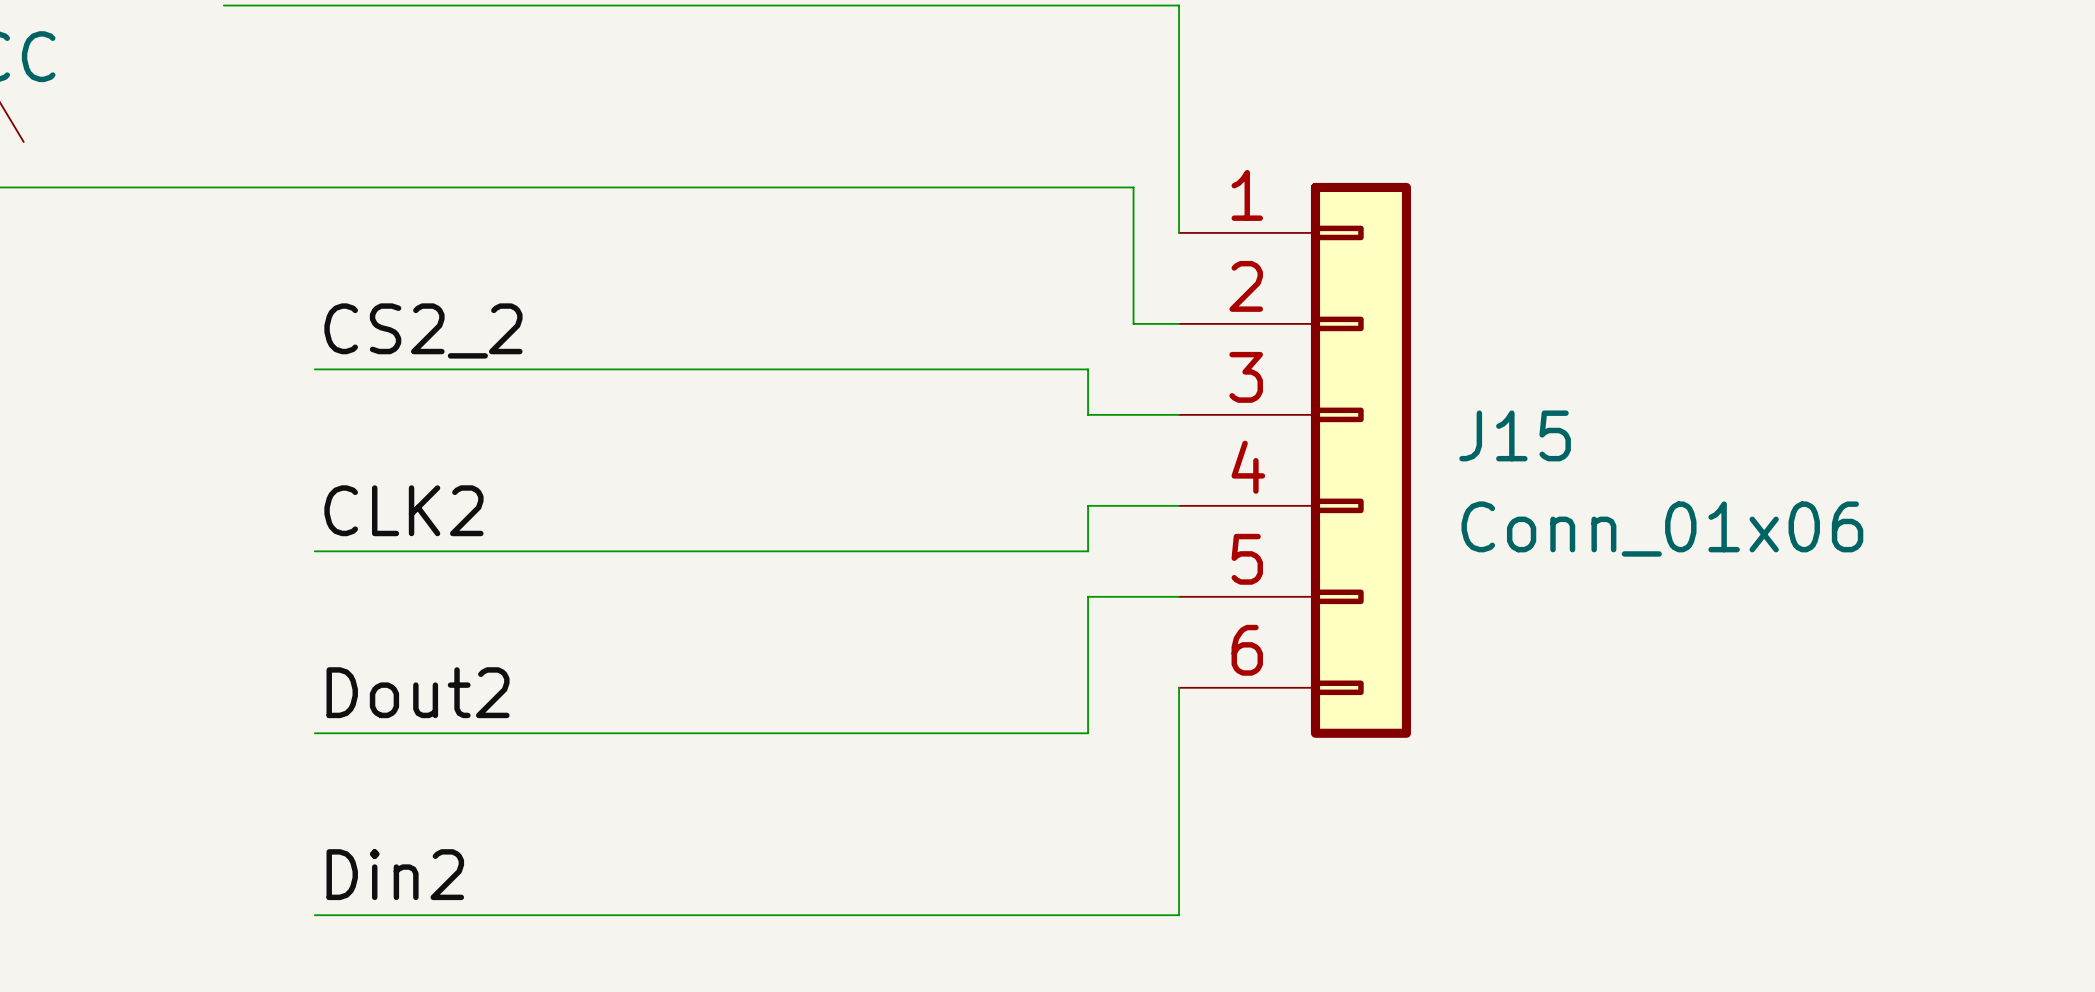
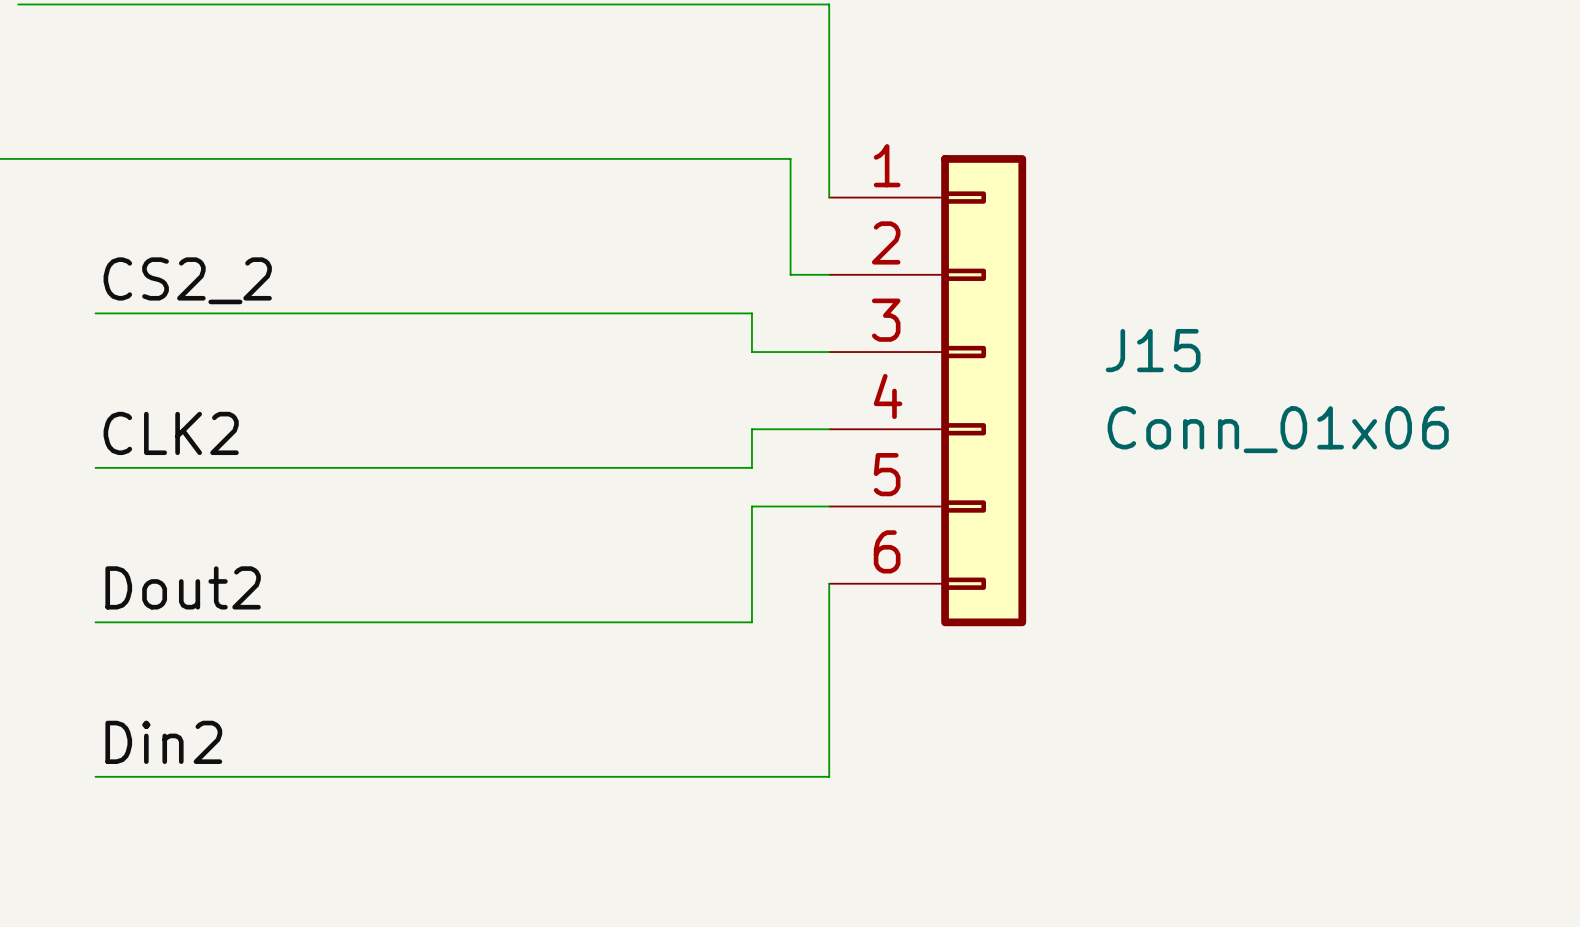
J15 name position: J15 (1515, 435) -> J15 (1153, 350)
J15 value position: Conn_01x06 (1662, 529) -> Conn_01x06 (1278, 429)

